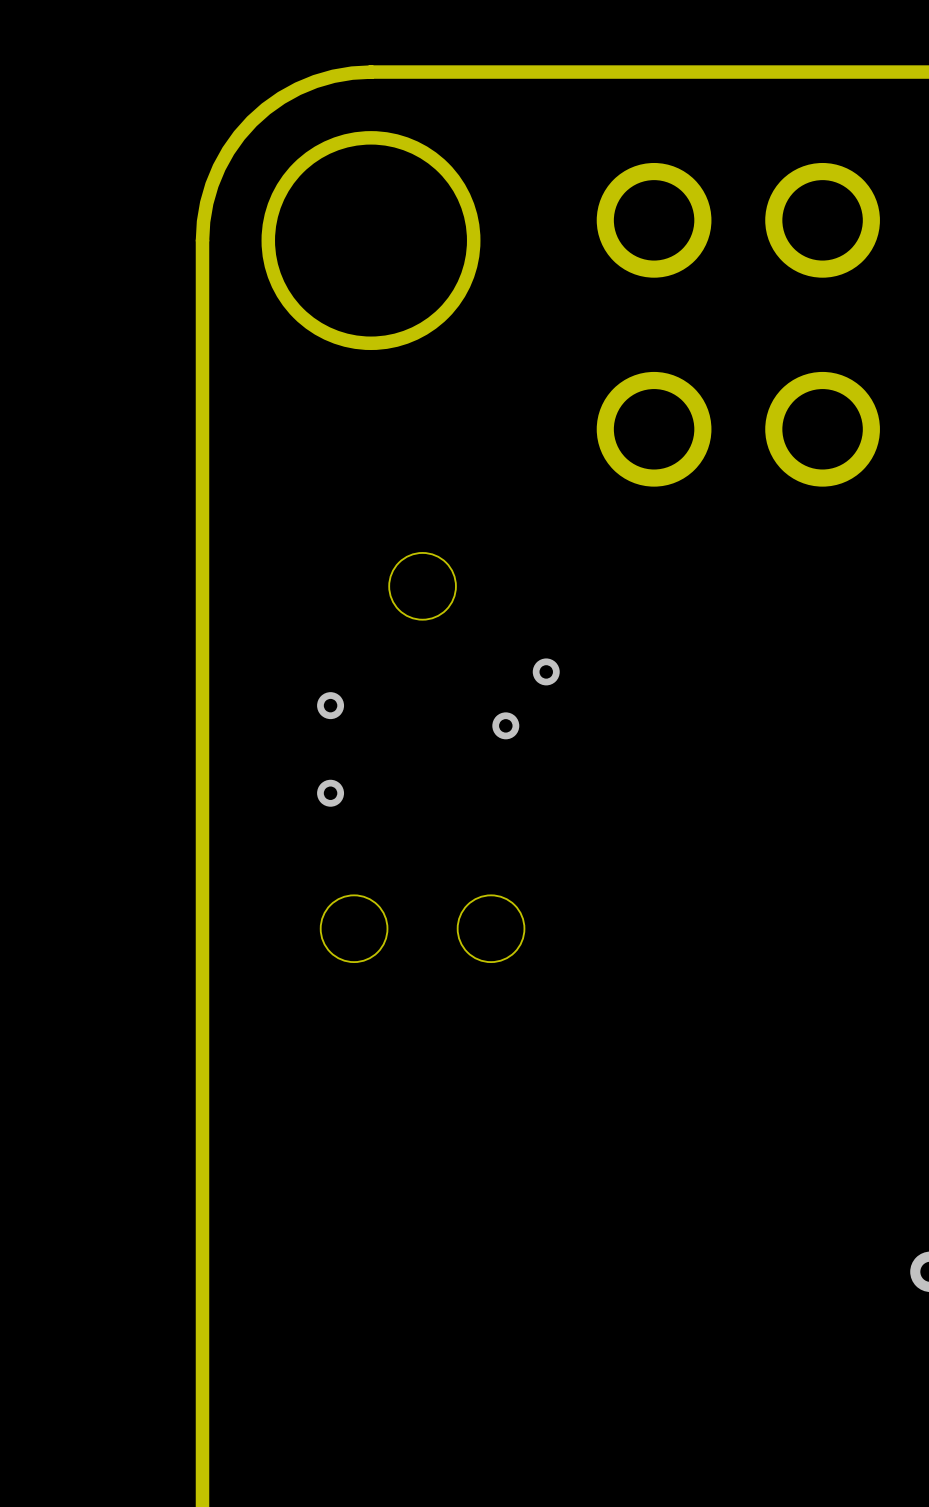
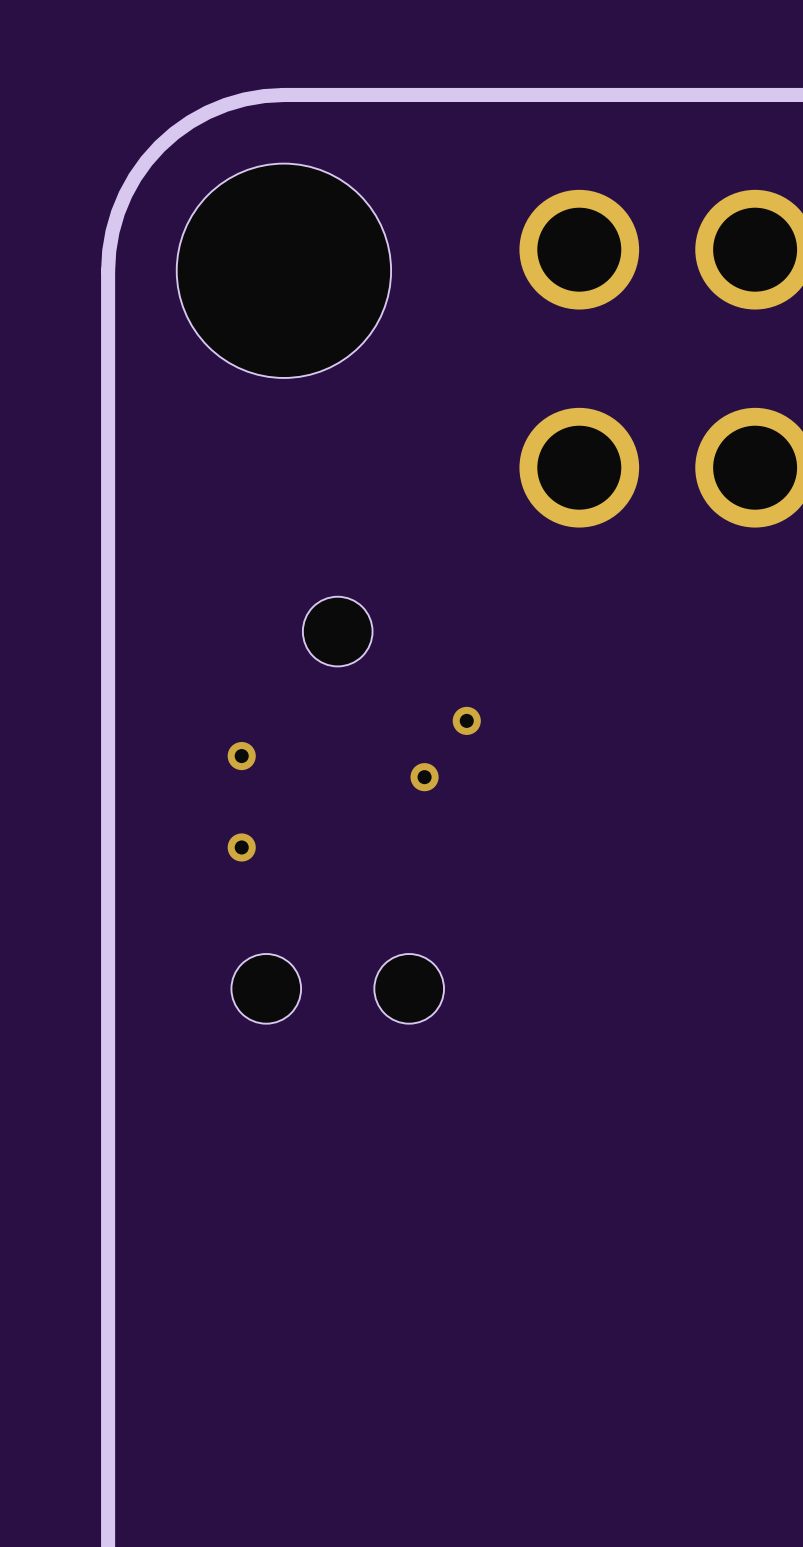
round board edge: [261, 131, 481, 351] -> none
part: none -> (283, 270)

